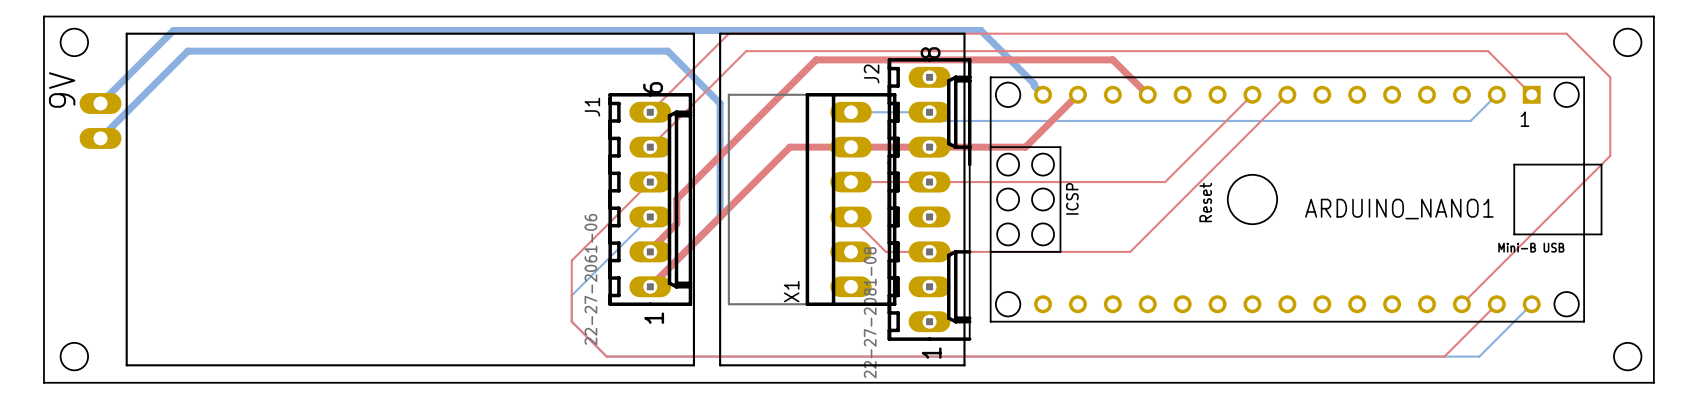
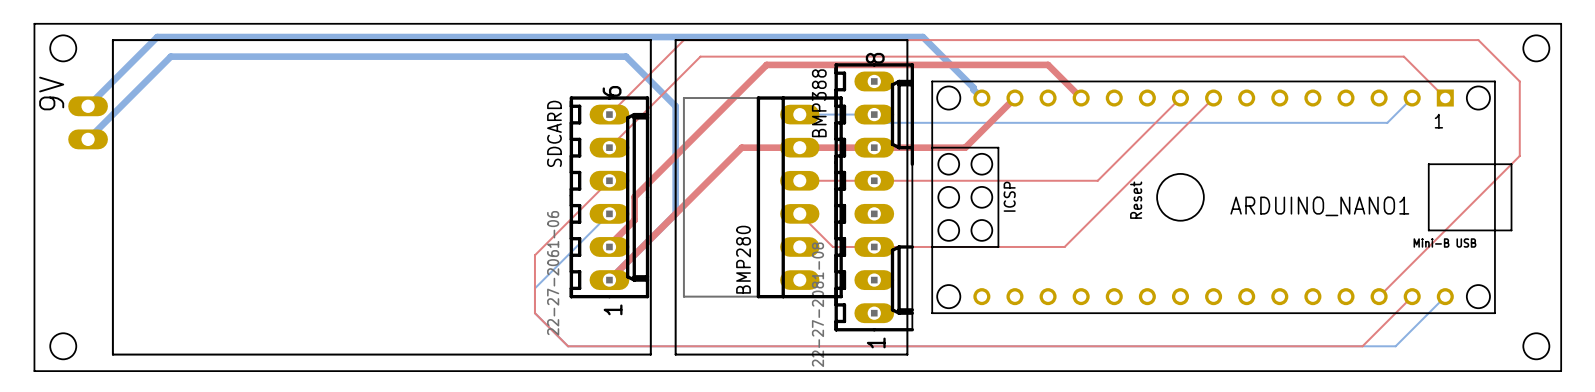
J2 name: J2 (871, 73) -> BMP388 (819, 103)
J1 name: J1 (592, 107) -> SDCARD (554, 133)
X1 name: X1 (791, 291) -> BMP280 (743, 259)

